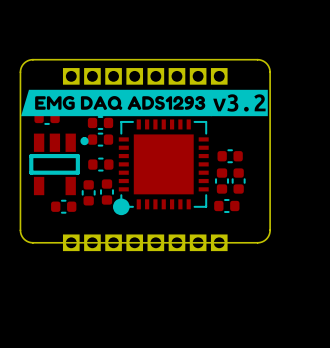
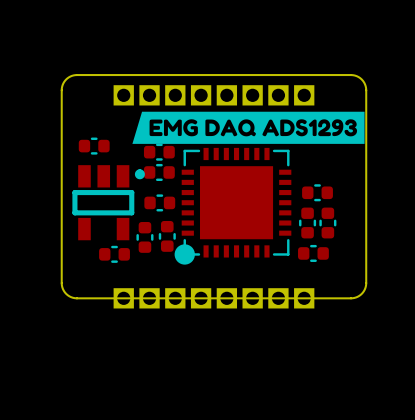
drawing: [210, 89, 268, 117] -> none
drawing position: (116, 102) -> (248, 127)

